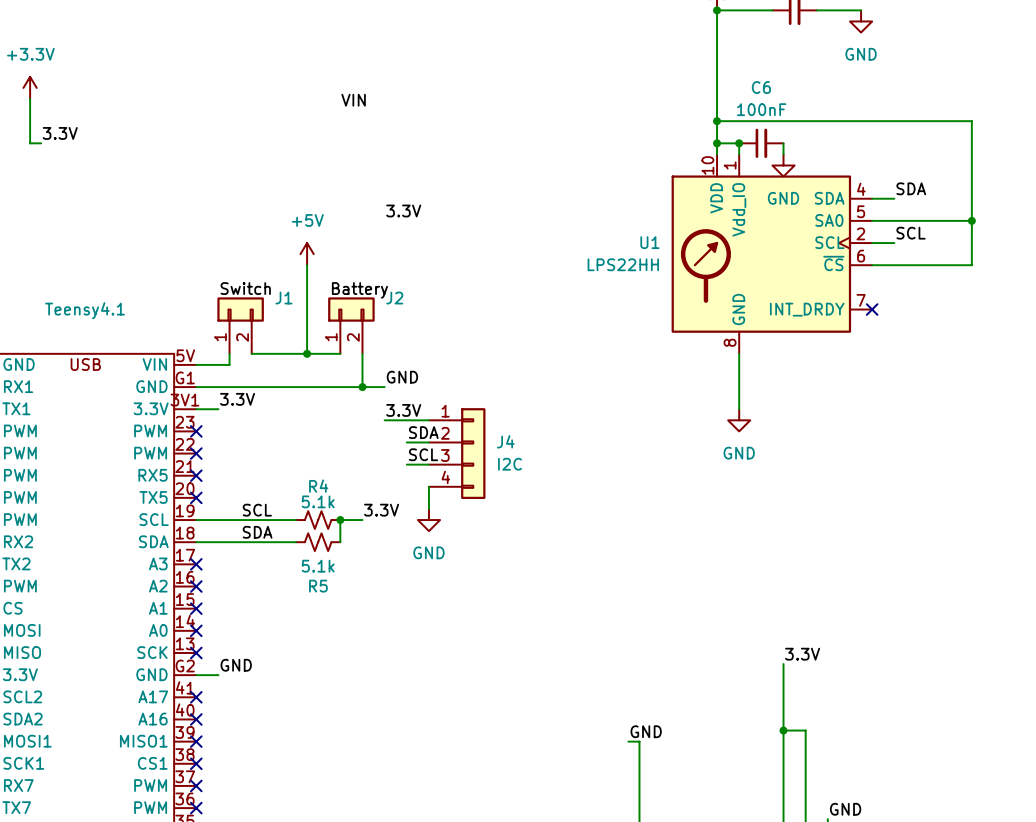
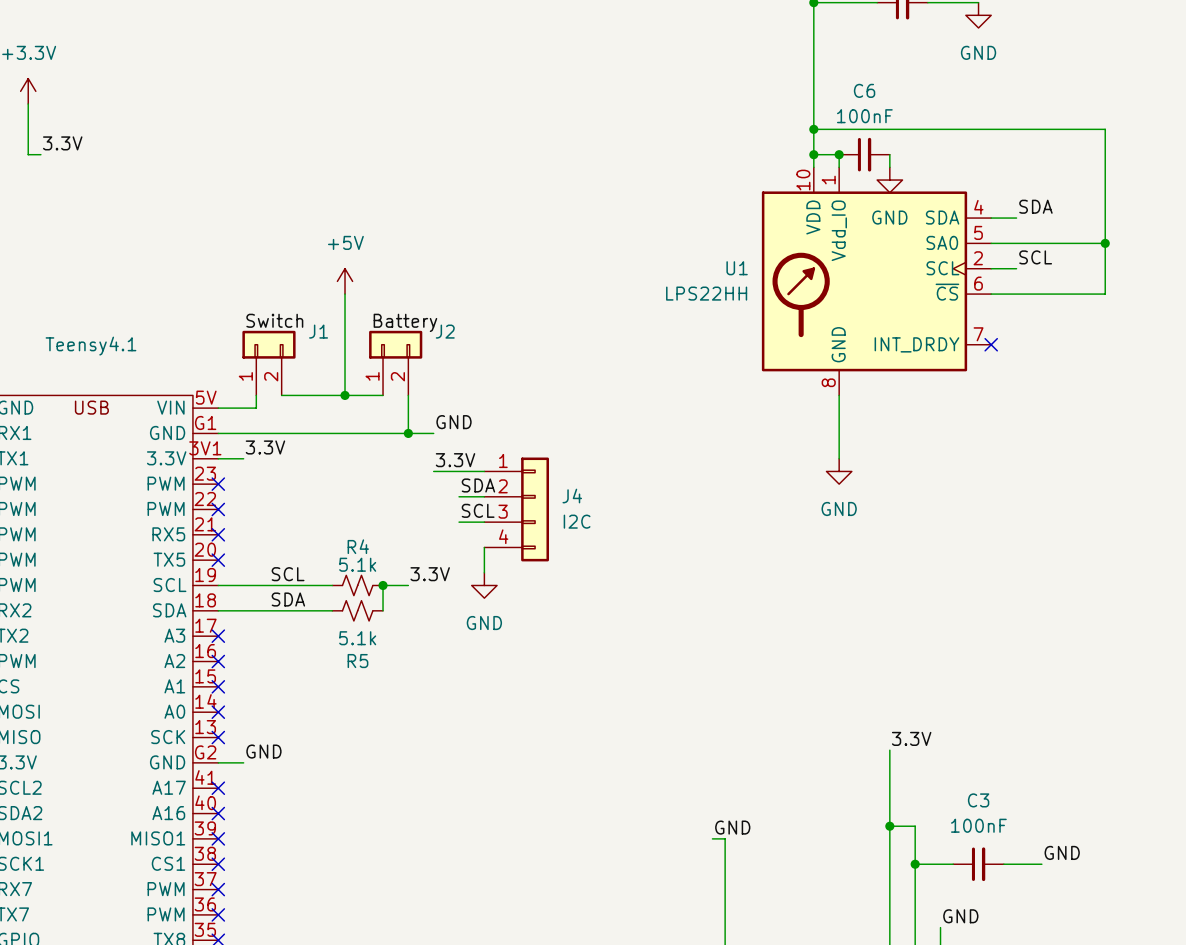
label: VIN (353, 100) -> none
label: 3.3V (403, 211) -> none
label: none -> GND (1062, 852)
wire: none -> (915, 864) (953, 864)
junction: none -> (915, 864)
C3: none -> 100nF (978, 864)
wire: none -> (1003, 864) (1041, 864)

